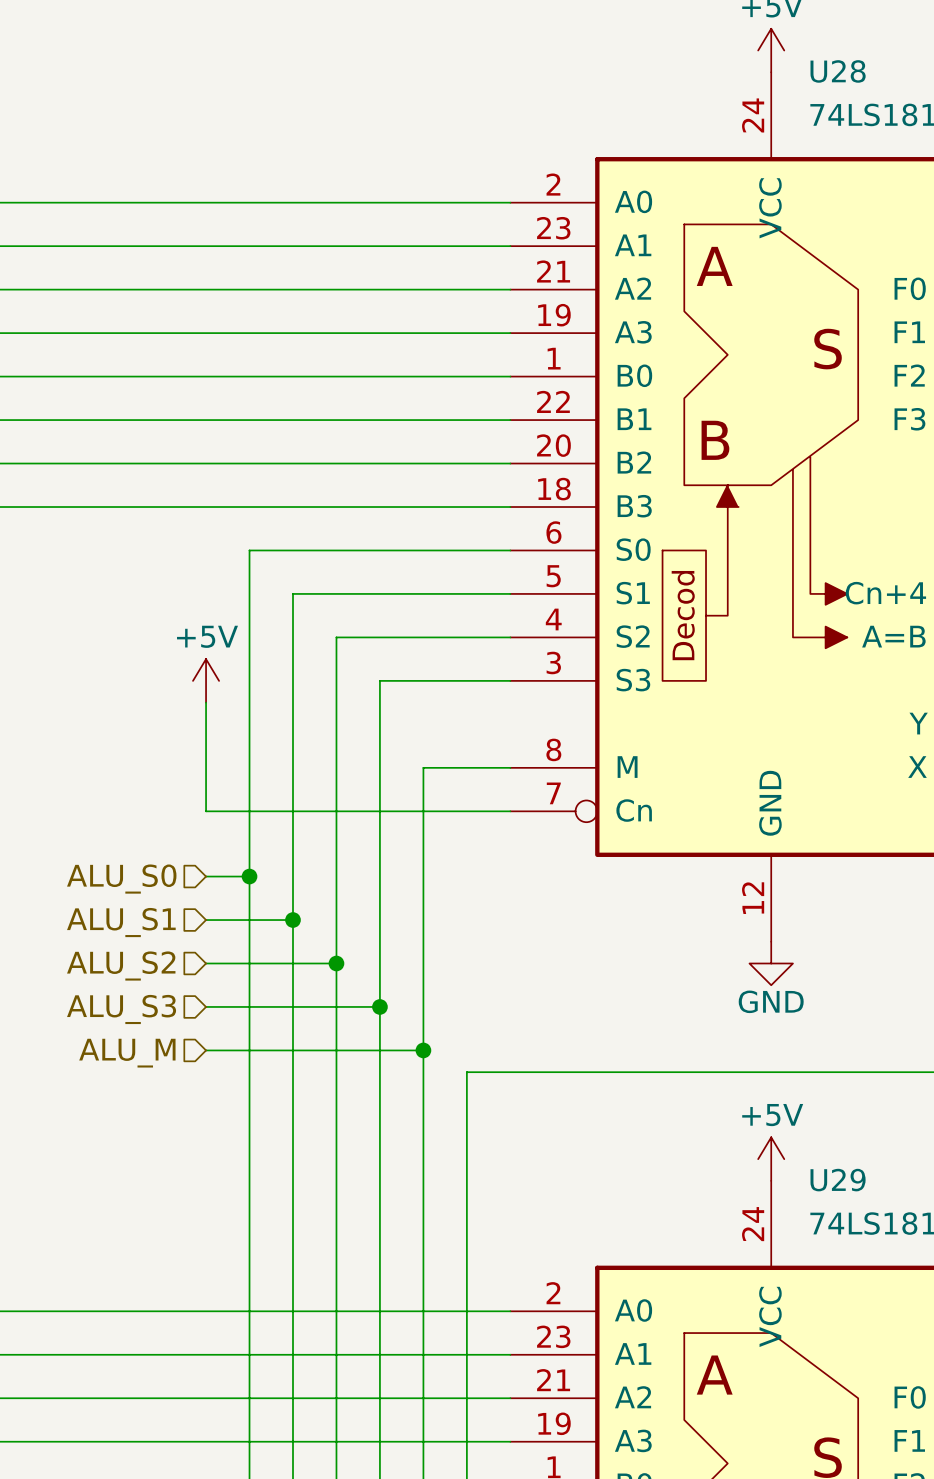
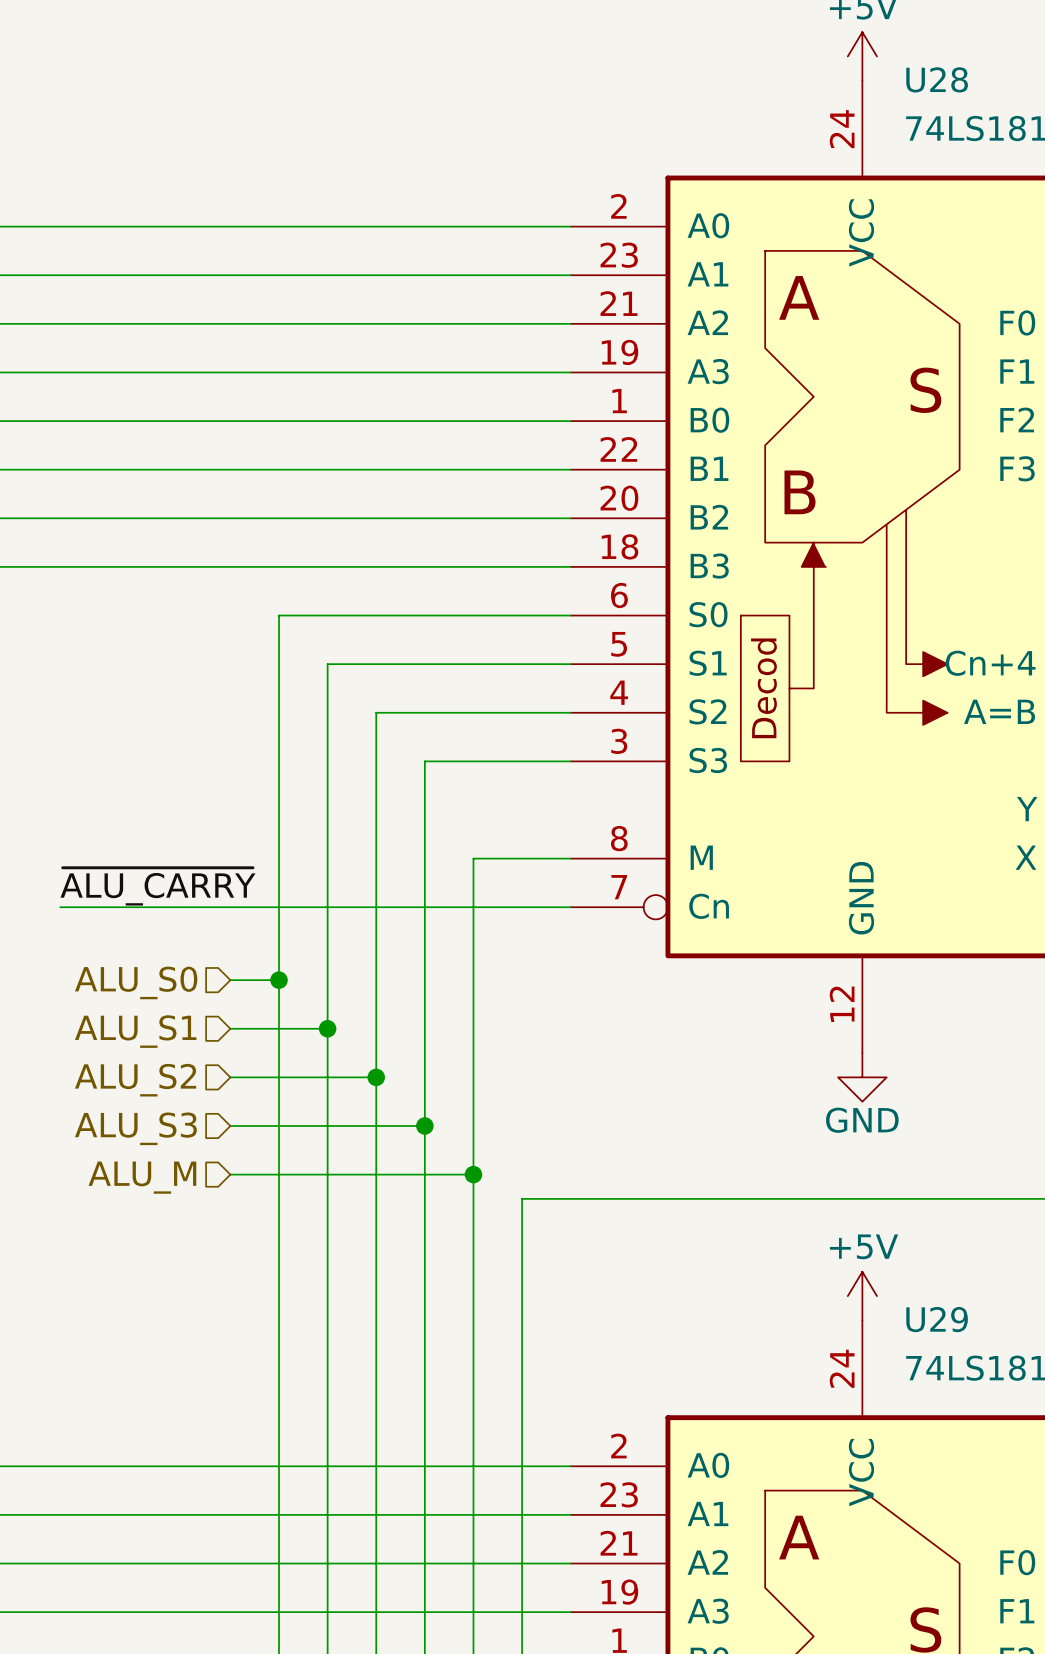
power symbol: +5V (206, 680) -> none
wire: (206, 702) (206, 811) -> (60, 907) (230, 907)
label: none -> ~{ALU_CARRY} (158, 886)

